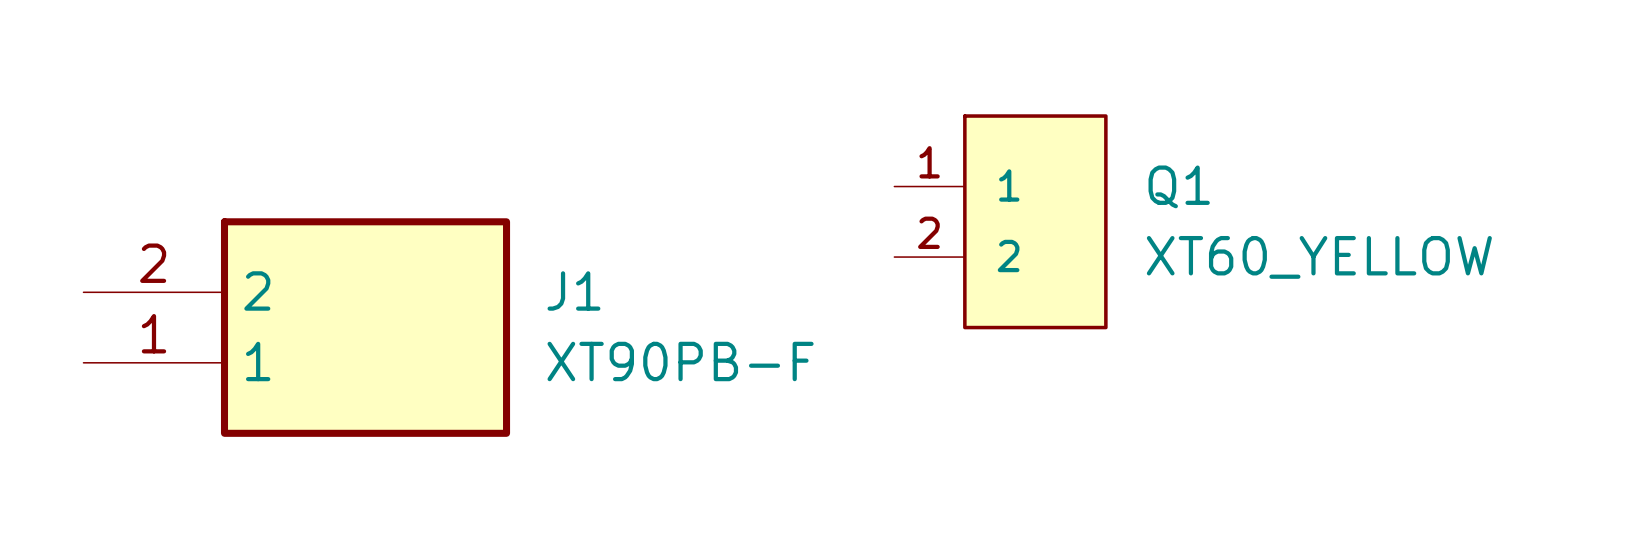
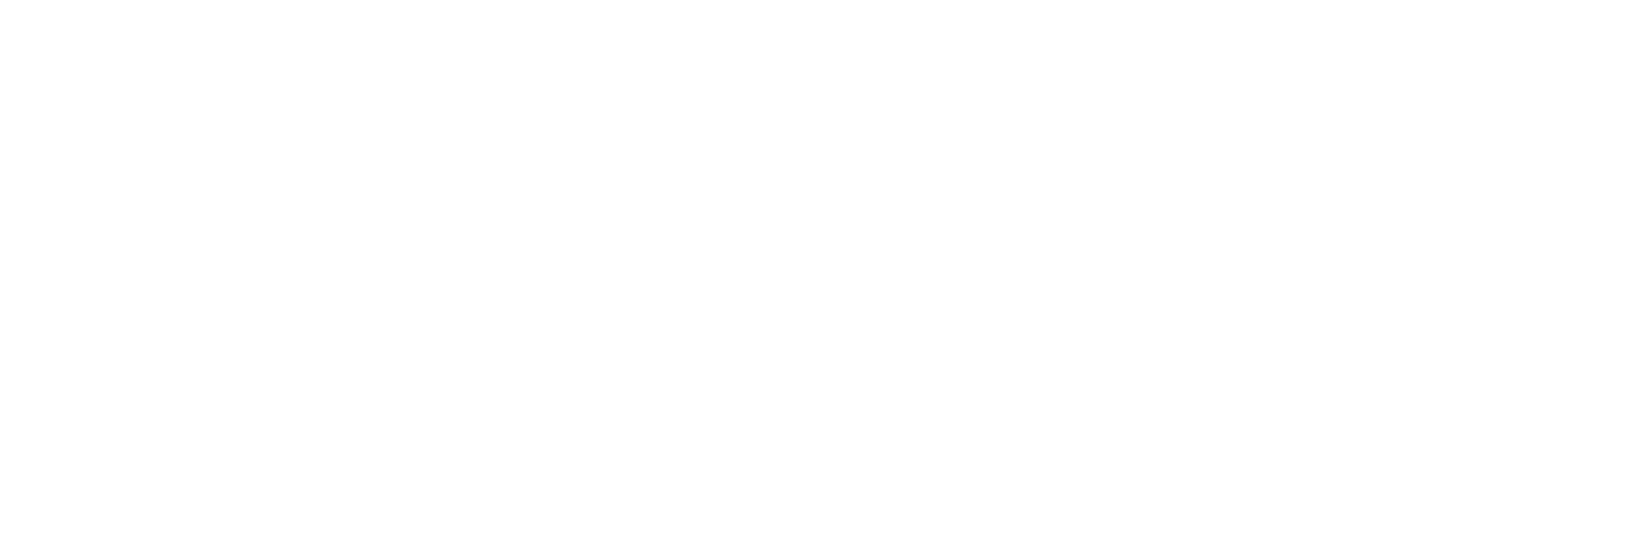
Q1: XT60_YELLOW (1000, 221) -> none
J1: XT90PB-F (296, 327) -> none

